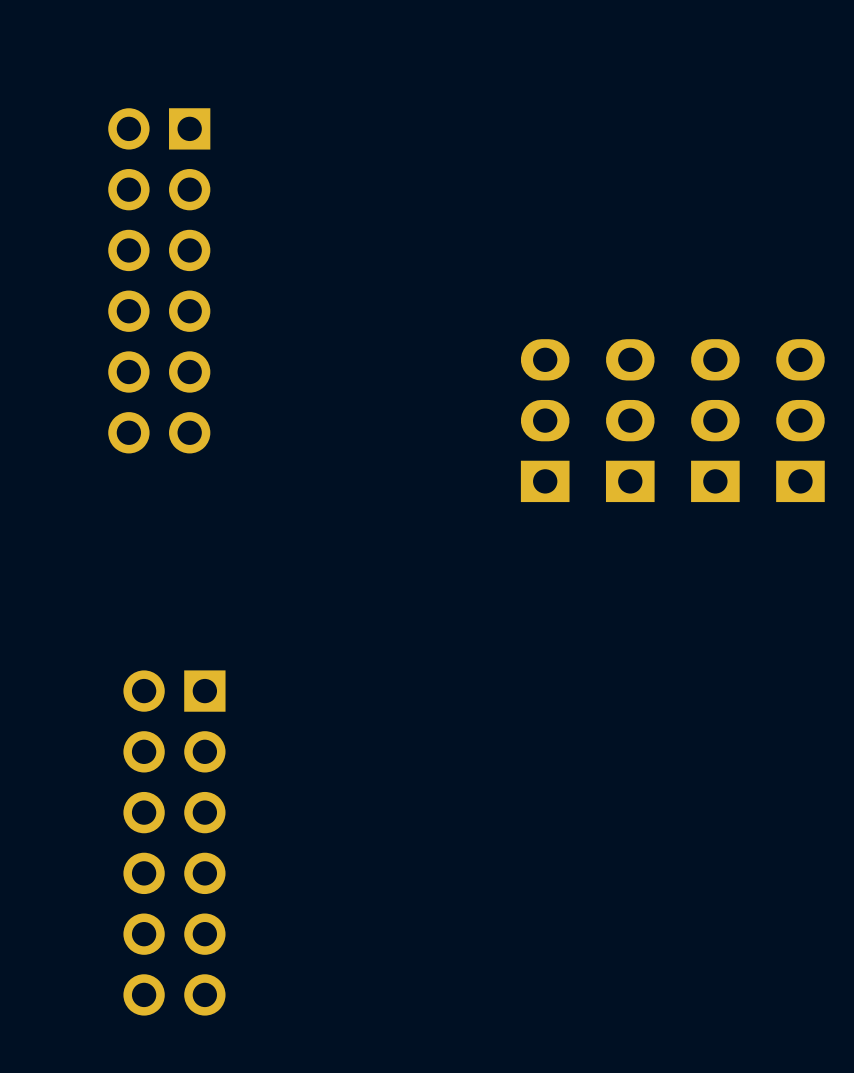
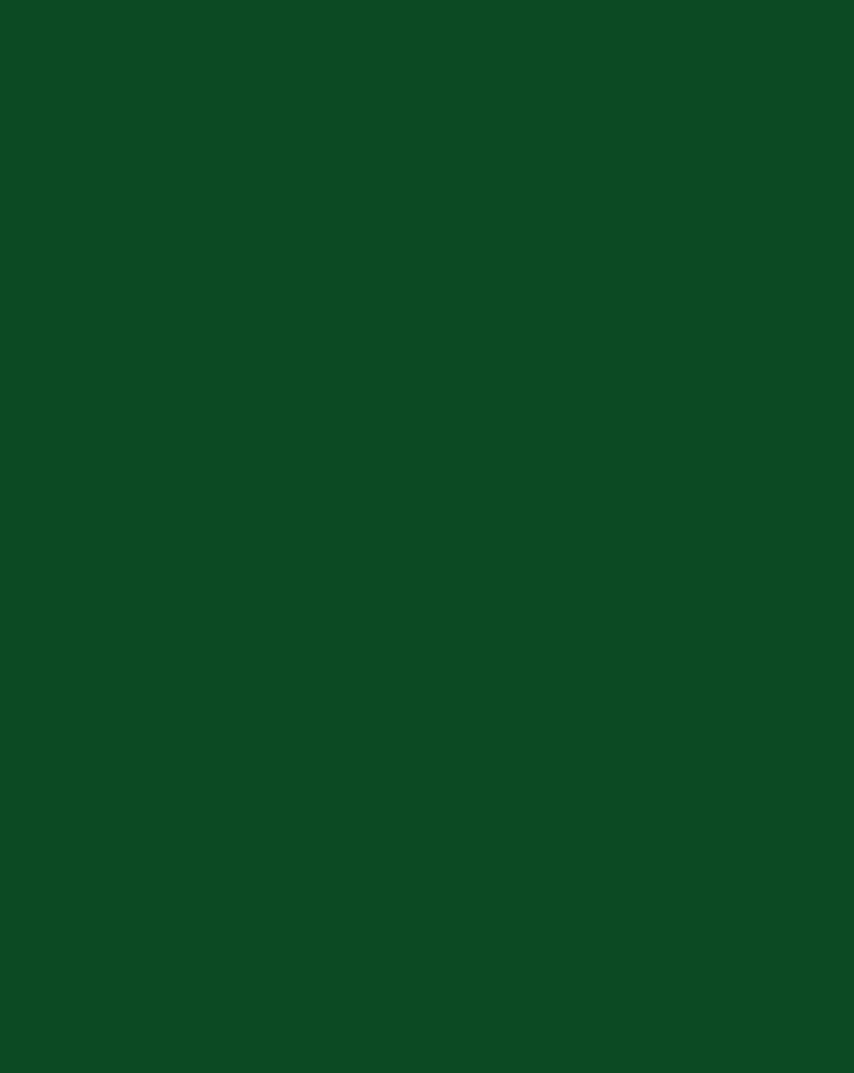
part: (159, 280) -> none
part: (545, 420) -> none
part: (630, 420) -> none
part: (715, 420) -> none
part: (800, 420) -> none
part: (174, 843) -> none

